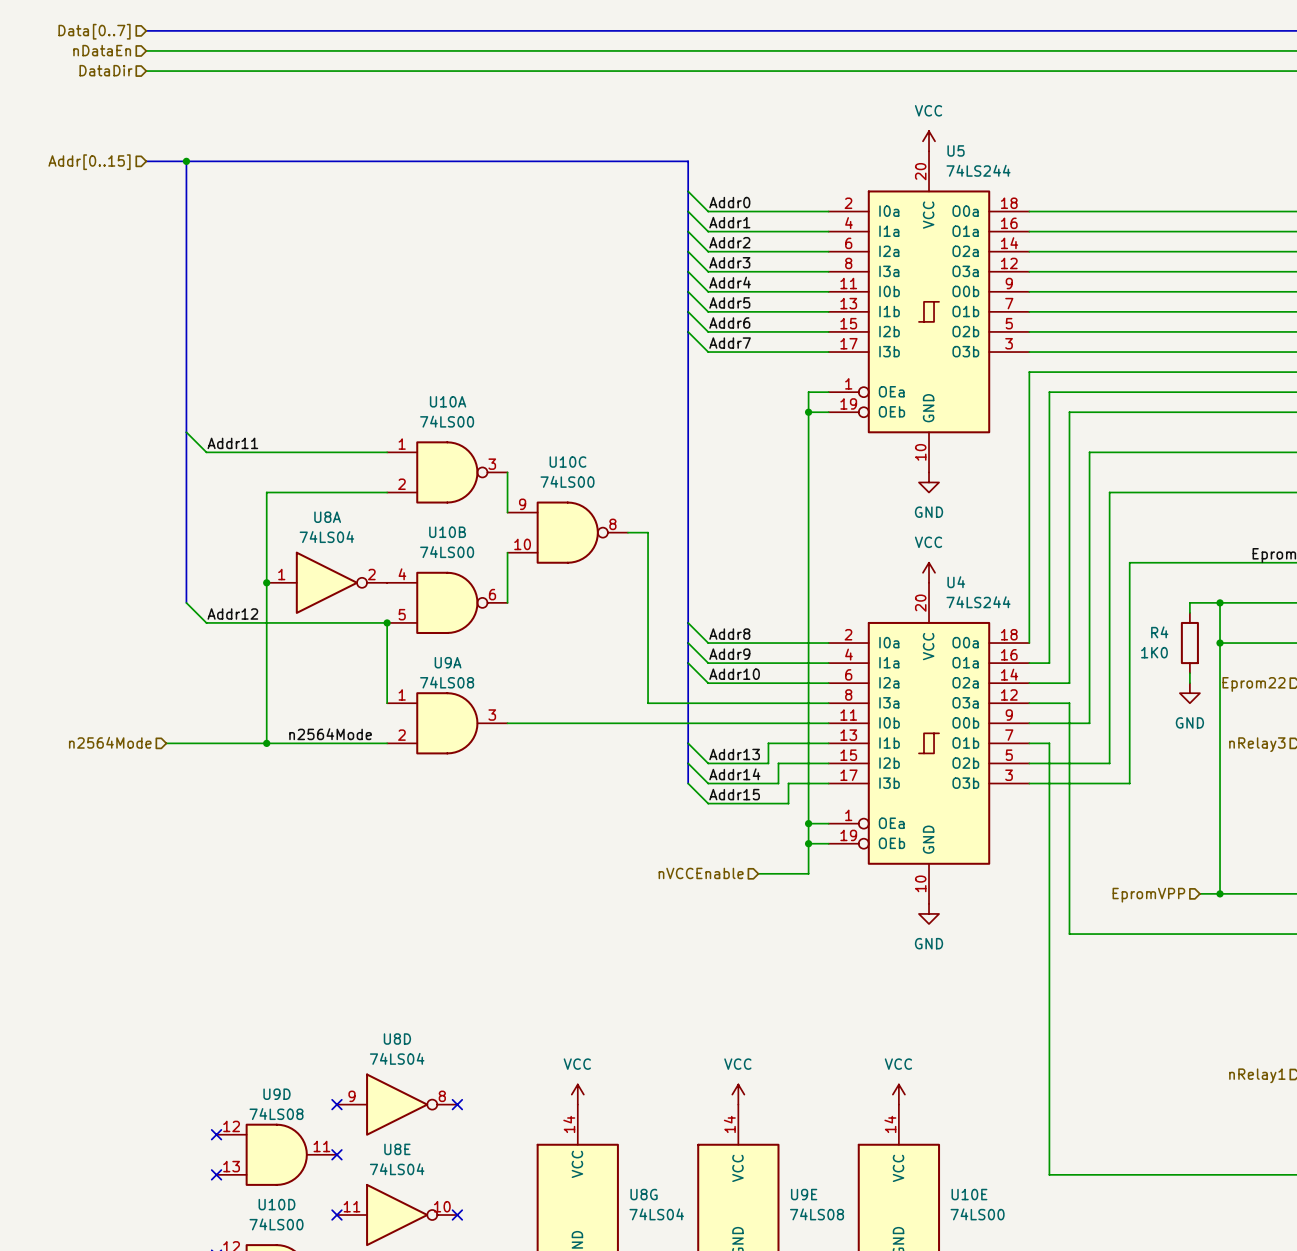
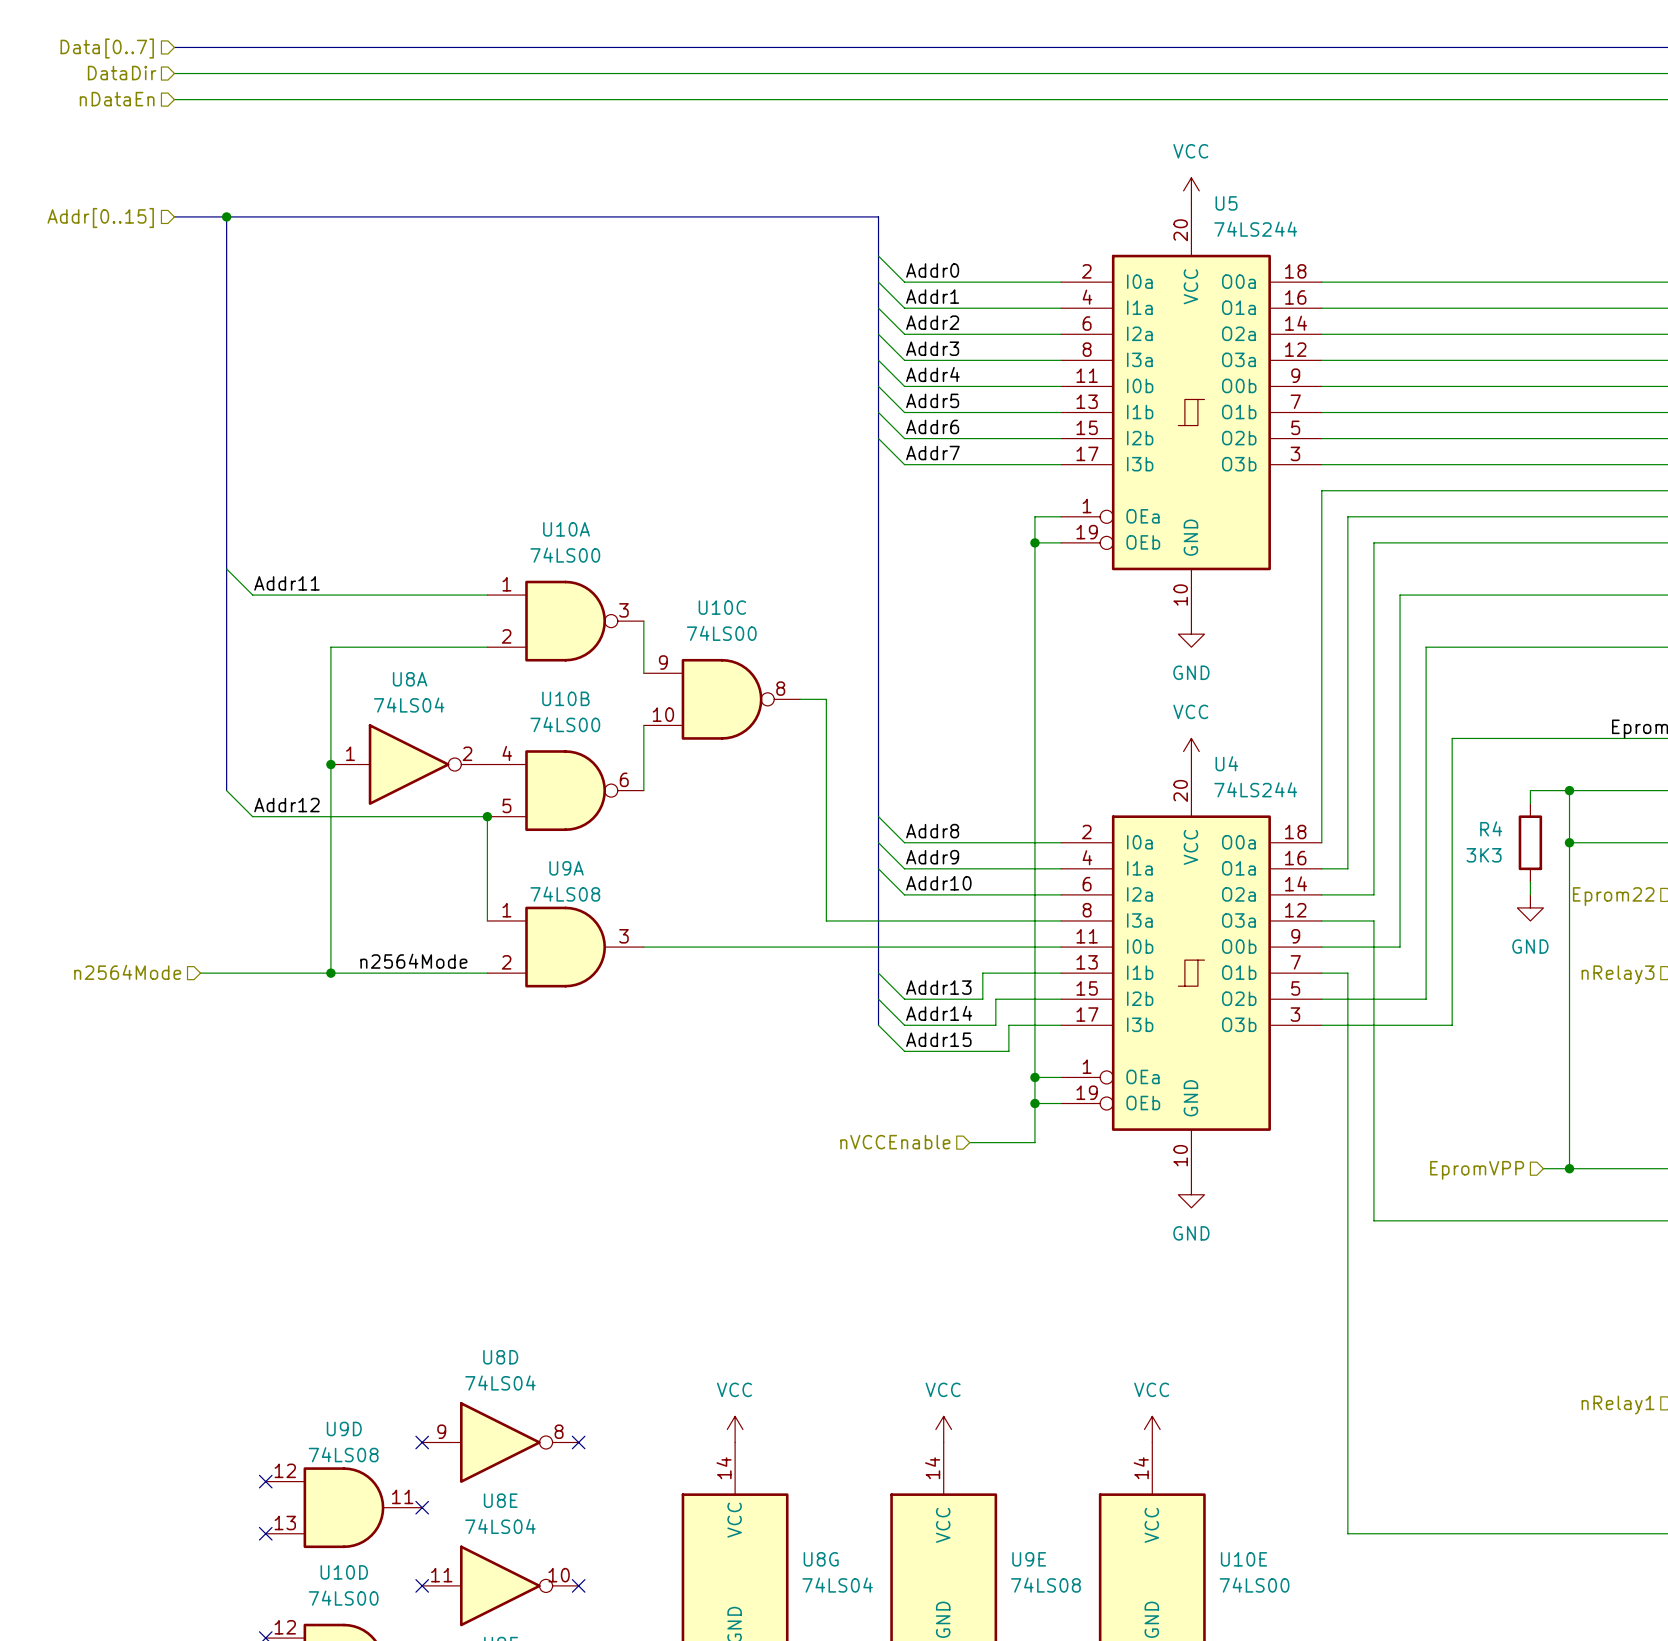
hierarchical label: nDataEn (102, 50) -> DataDir (122, 73)
hierarchical label: DataDir (106, 70) -> nDataEn (117, 99)
R4 value: 1K0 (1154, 652) -> 3K3 (1484, 855)

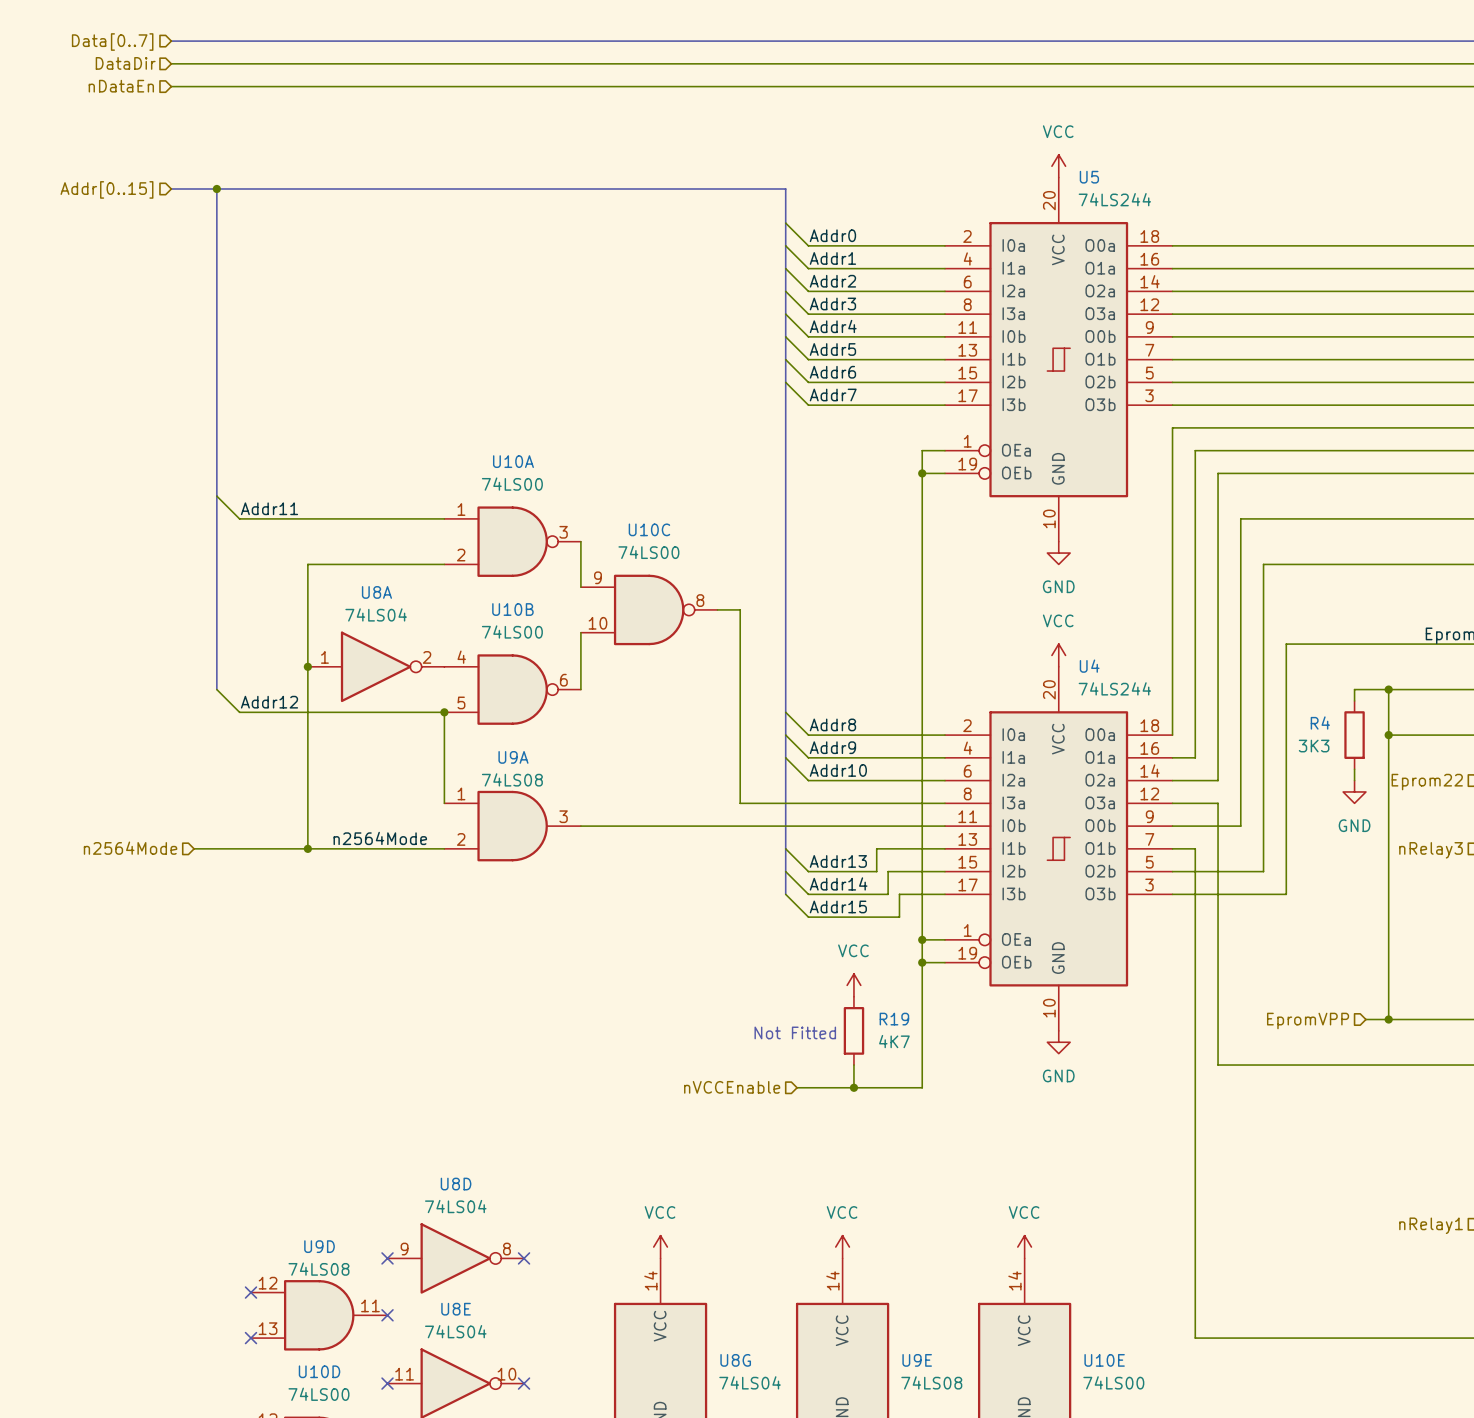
power symbol: none -> VCC (853, 985)
hierarchical label position: nVCCEnable (895, 1142) -> nVCCEnable (732, 1087)
wire: (969, 1142) (1034, 1142) -> (797, 1087) (922, 1087) (922, 996)
R19: none -> 4K7 (853, 1030)
text: none -> Not Fitted (795, 1032)
wire: none -> (853, 1065) (853, 1087)
junction: none -> (853, 1087)

